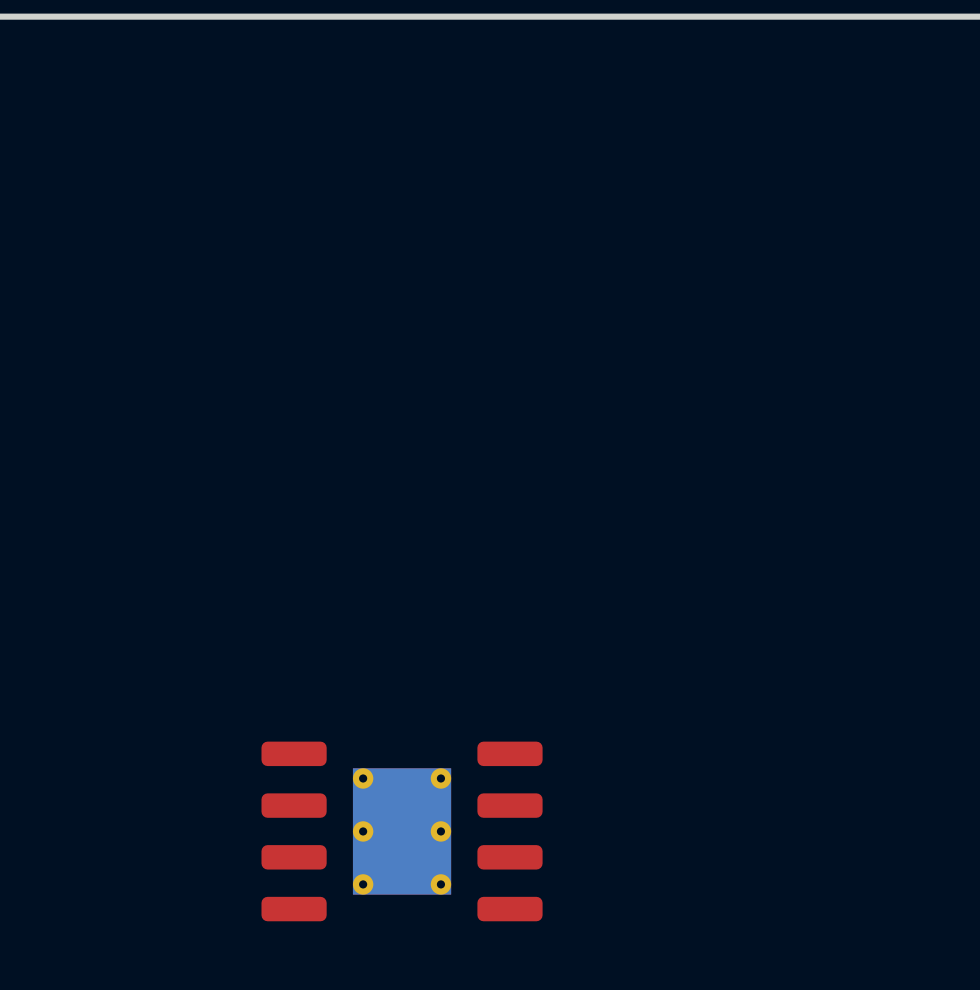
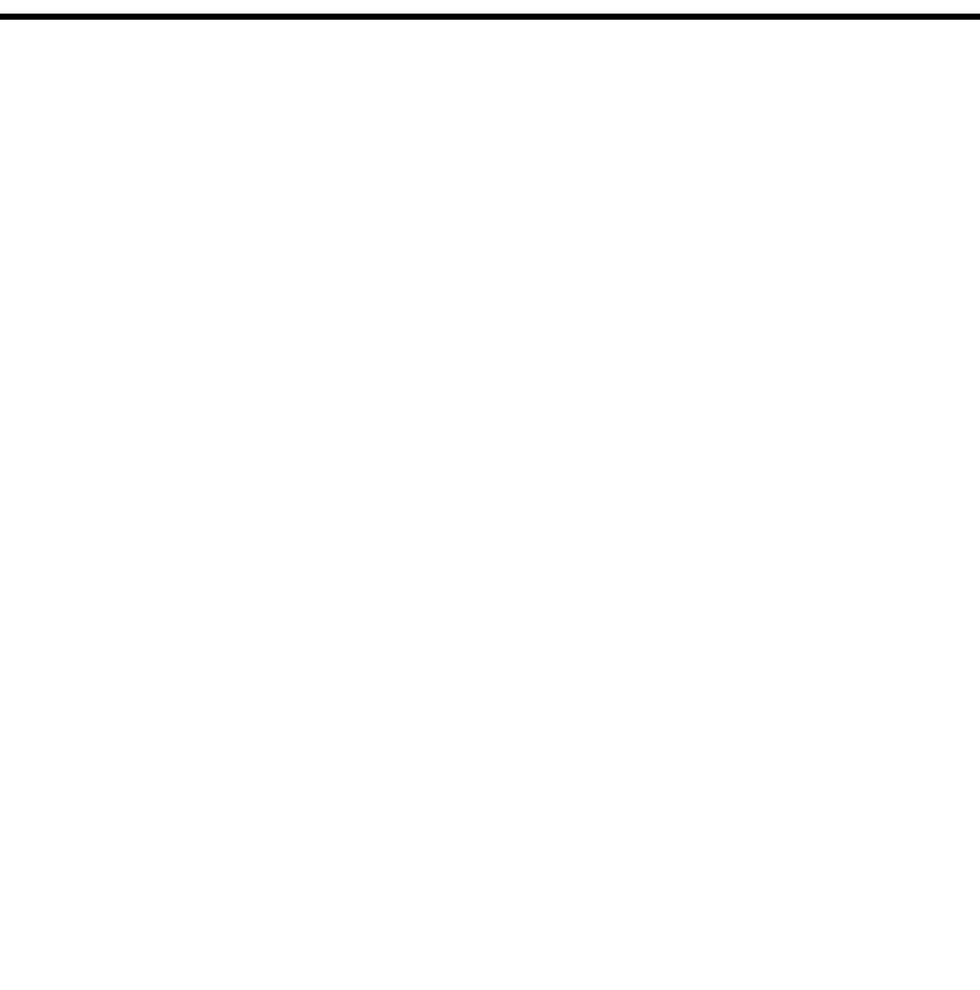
part: (402, 831) -> none

